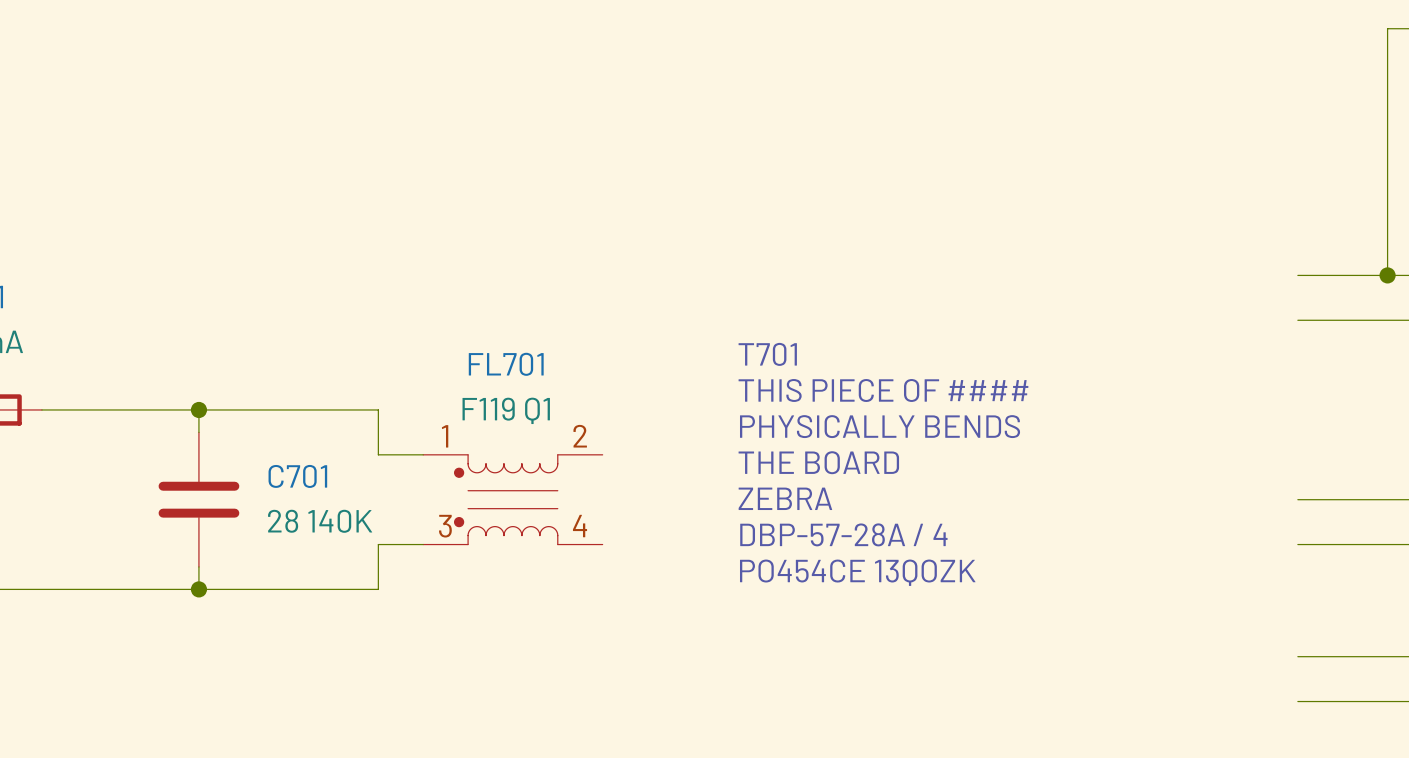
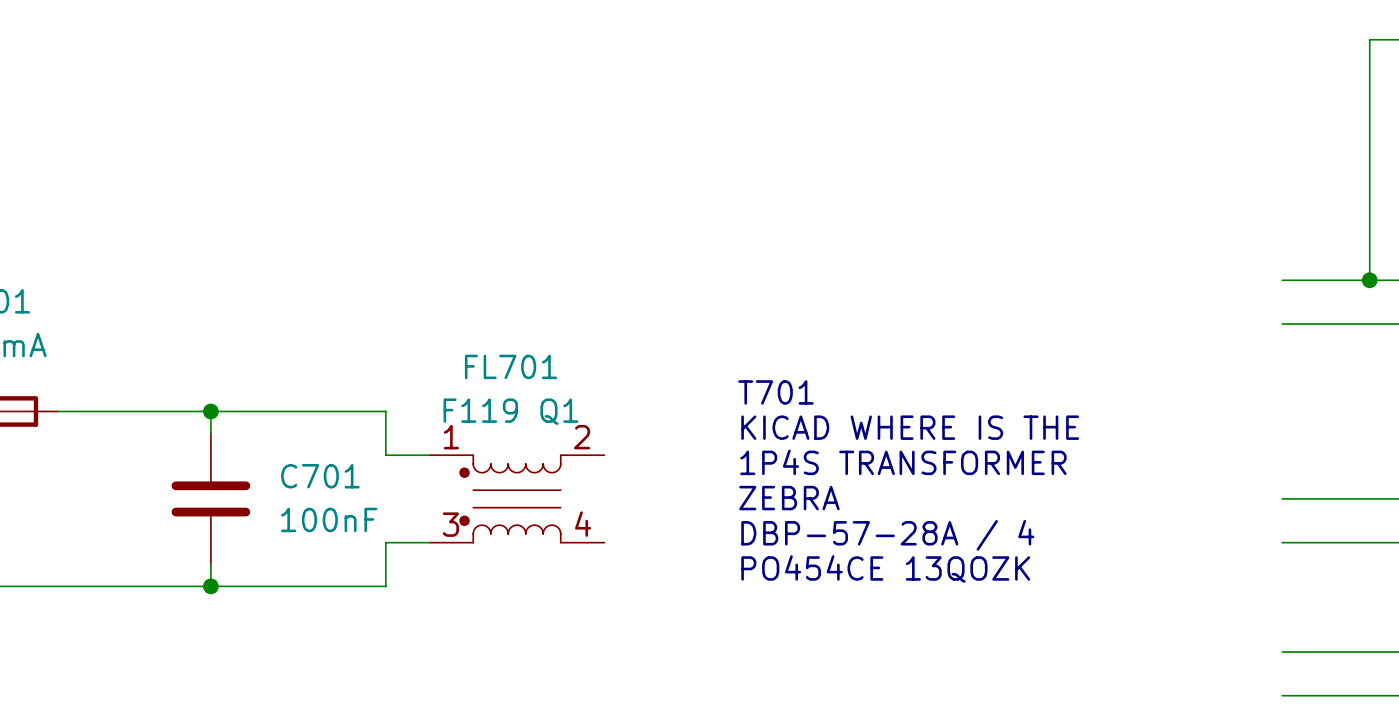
text: T701 (767, 354) -> none
text: THIS PIECE OF #### (883, 390) -> T701 (775, 392)
text: PHYSICALLY BENDS (880, 426) -> KICAD WHERE IS THE (910, 427)
text: THE BOARD (818, 462) -> 1P4S TRANSFORMER (903, 462)
C701 value: 28 140K (320, 521) -> 100nF (329, 519)

